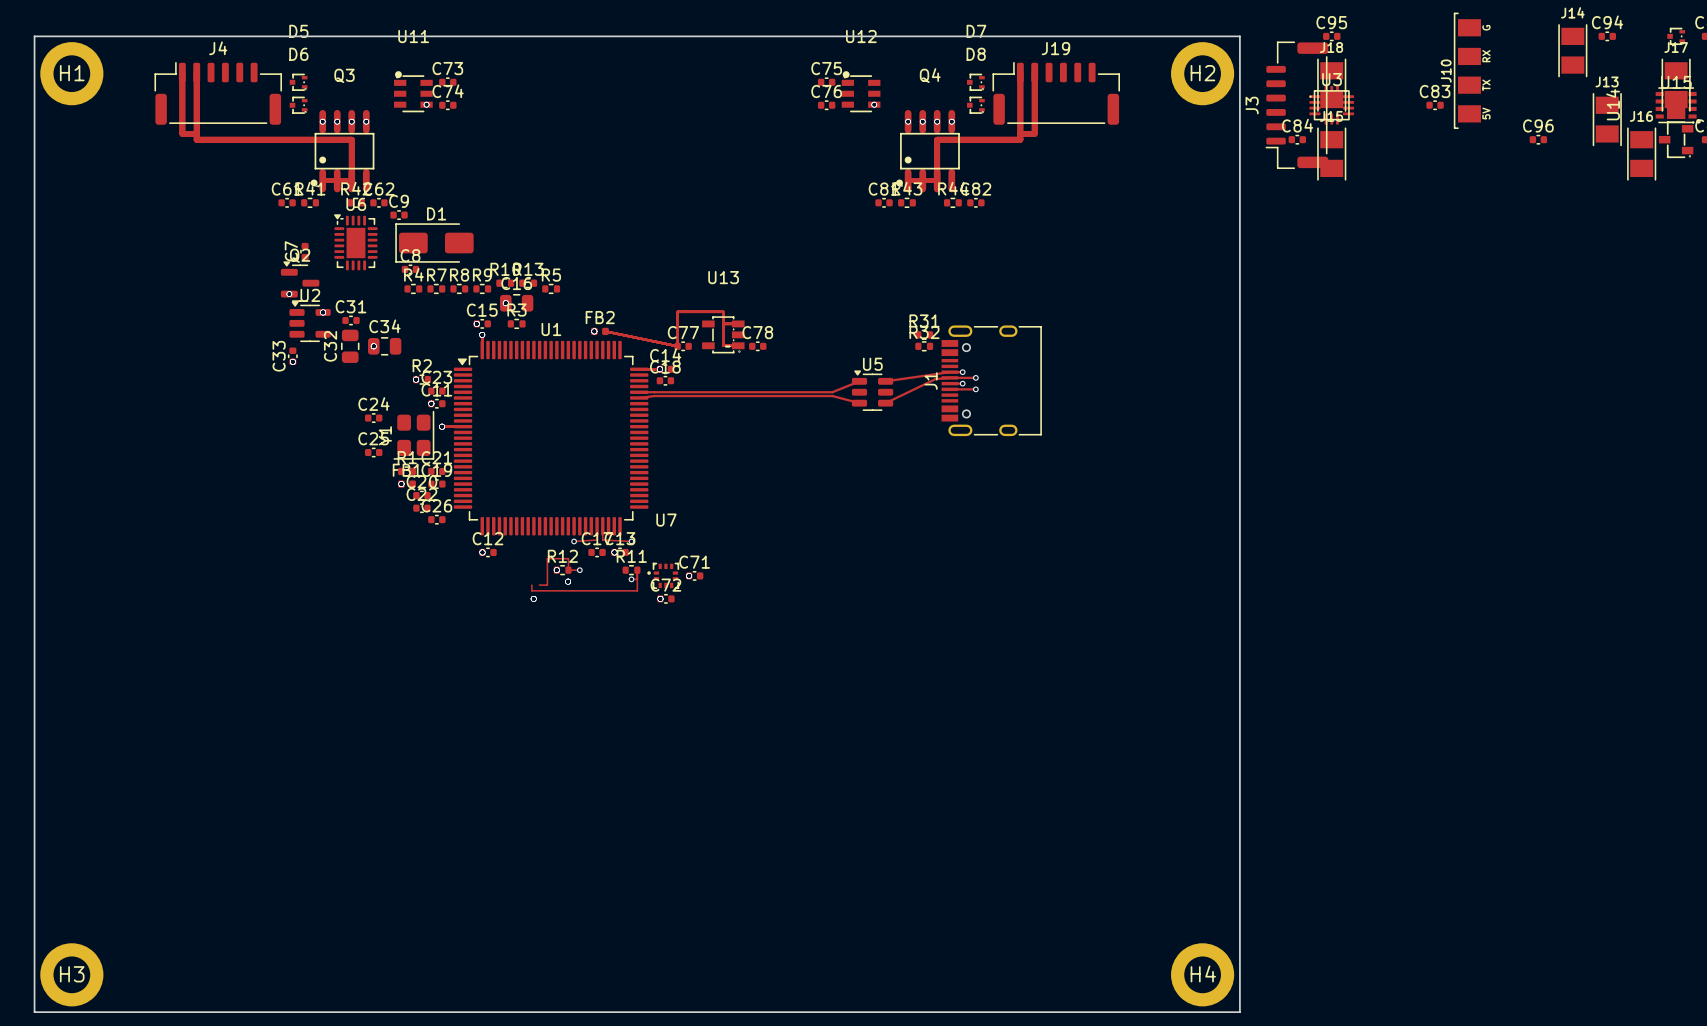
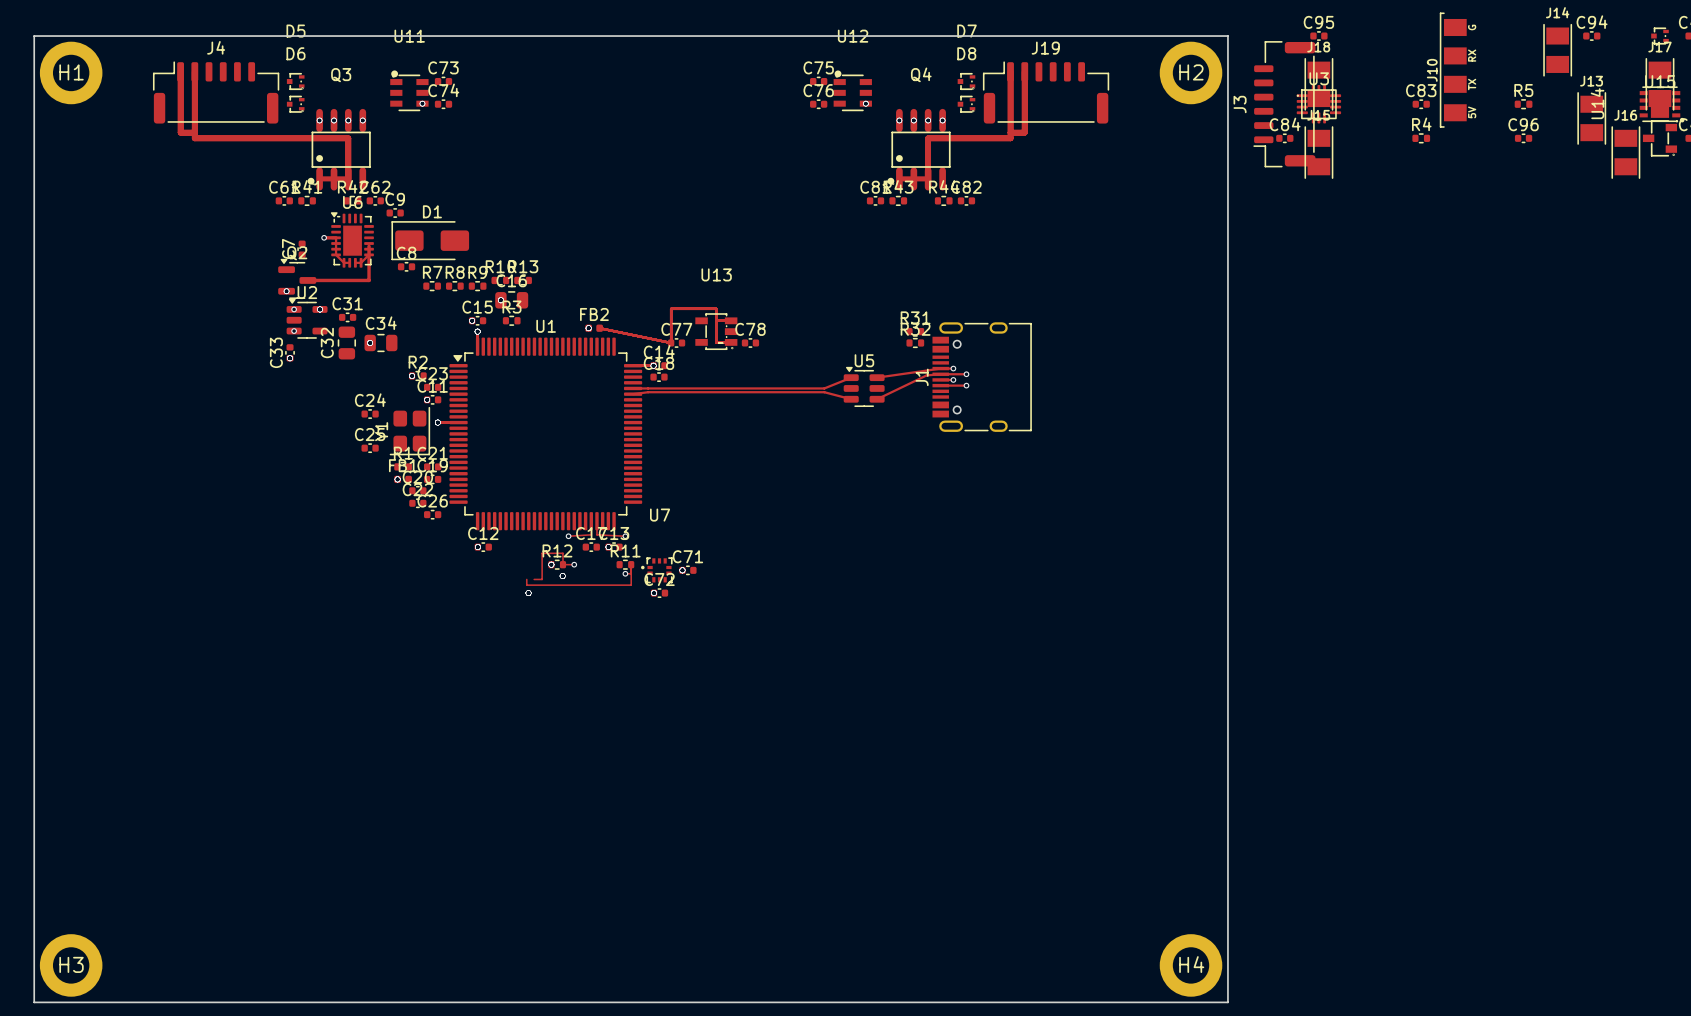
track: none -> (324, 237) (336, 237) (336, 254) (344, 262) (349, 262)
via: none -> (324, 237)
track: none -> (355, 262) (361, 262) (369, 254) (369, 246) (369, 280) (307, 280)
R4 position: (413, 288) -> (1421, 138)
R5 position: (551, 288) -> (1523, 104)
via: none -> (294, 309)
via: none -> (294, 331)

